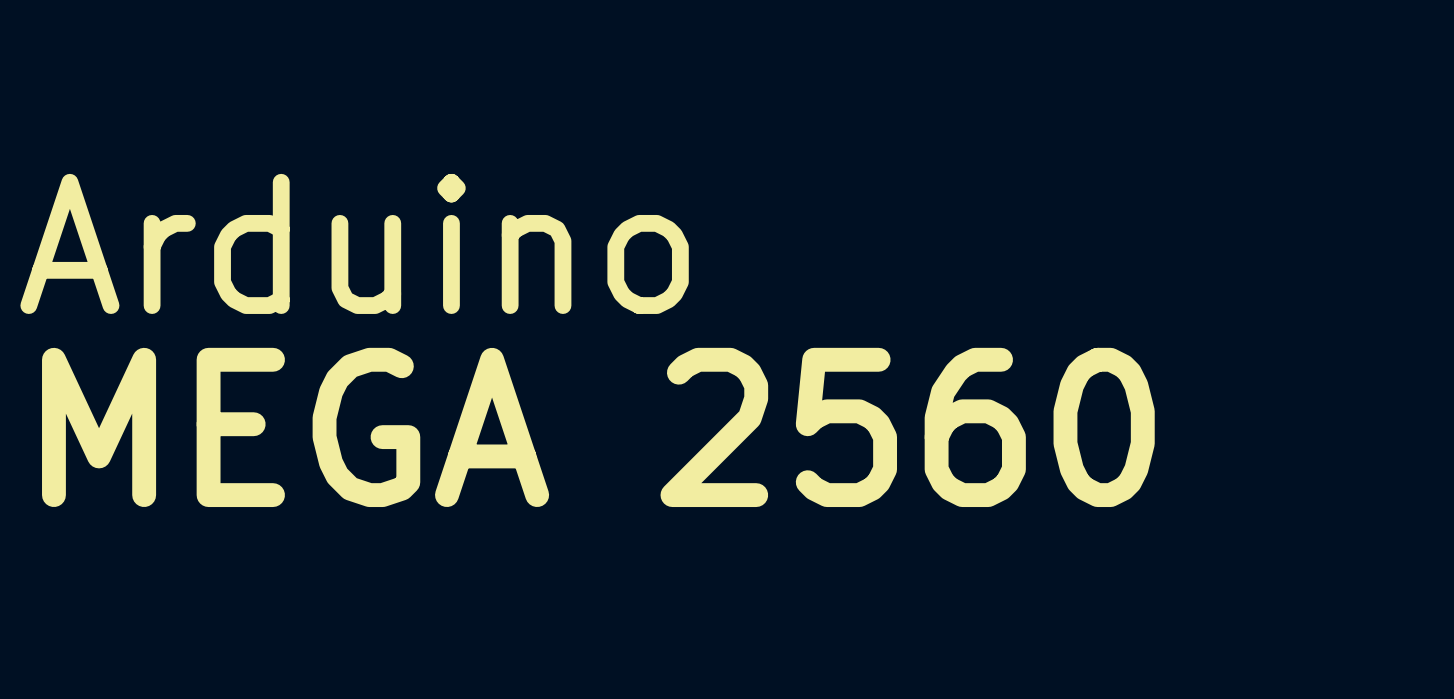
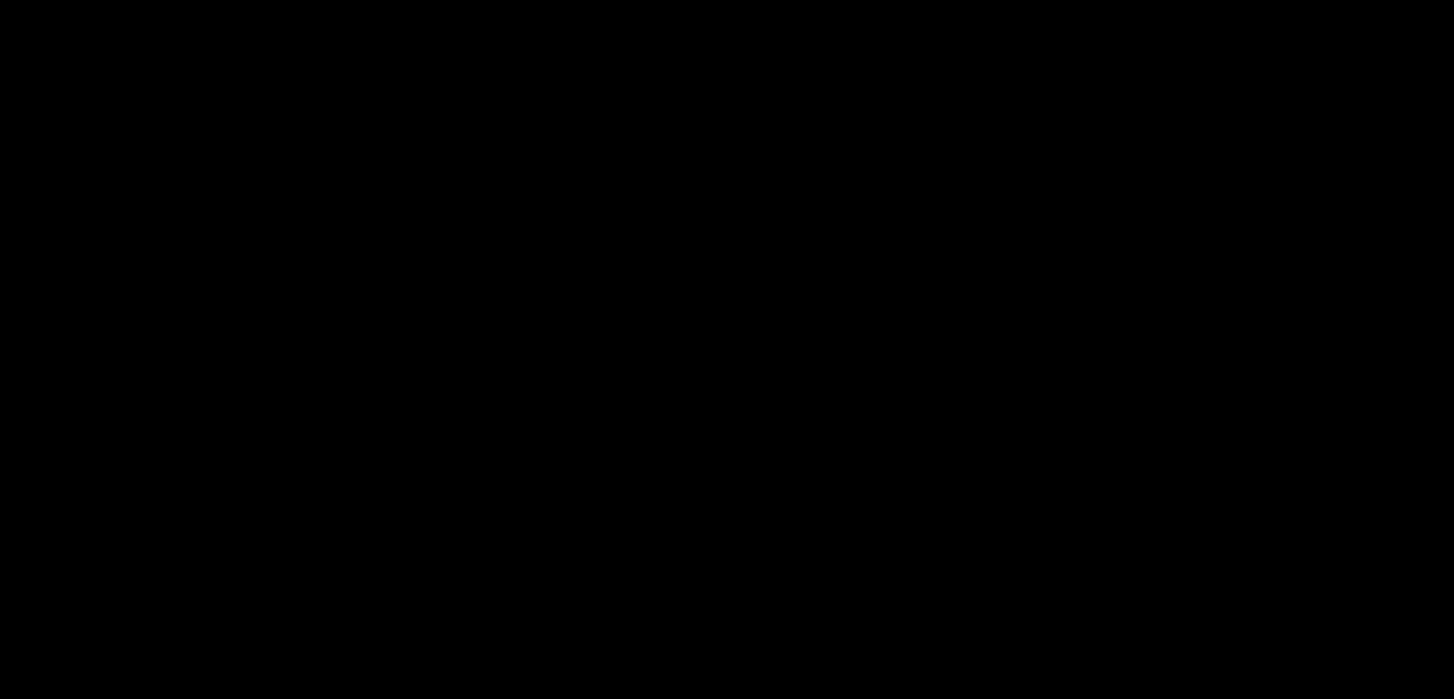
text: Arduino (354, 243) -> none
text: MEGA 2560 (598, 427) -> none

